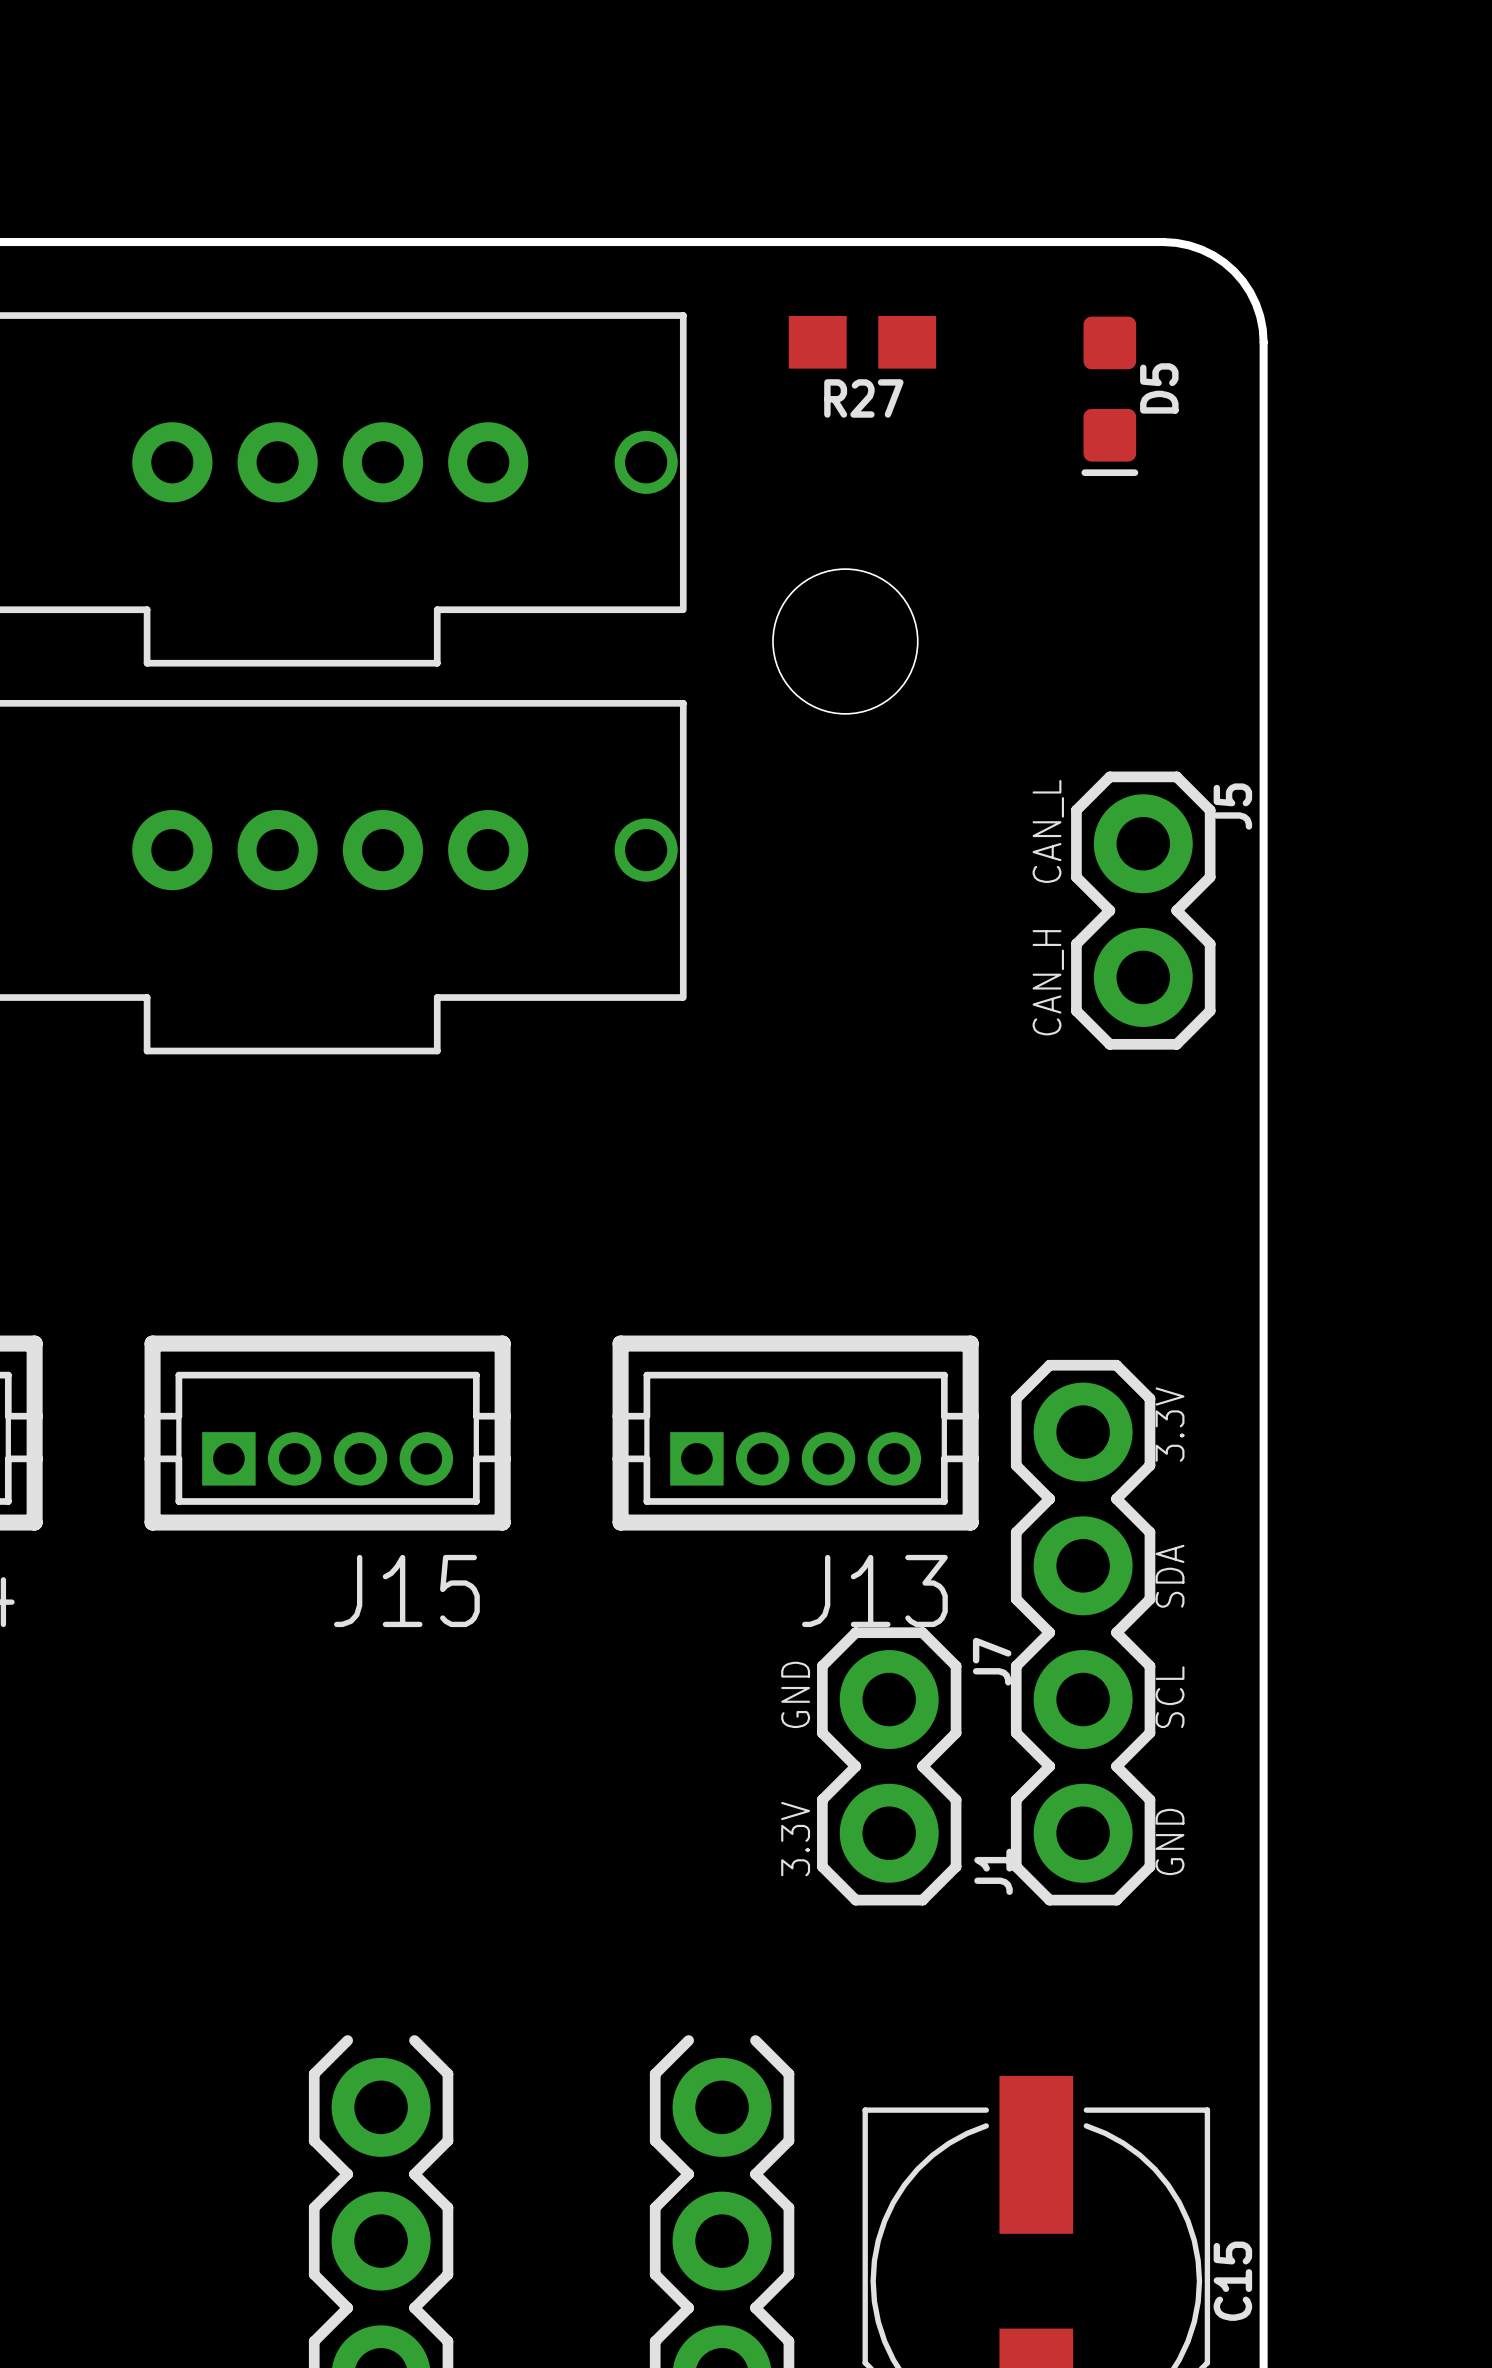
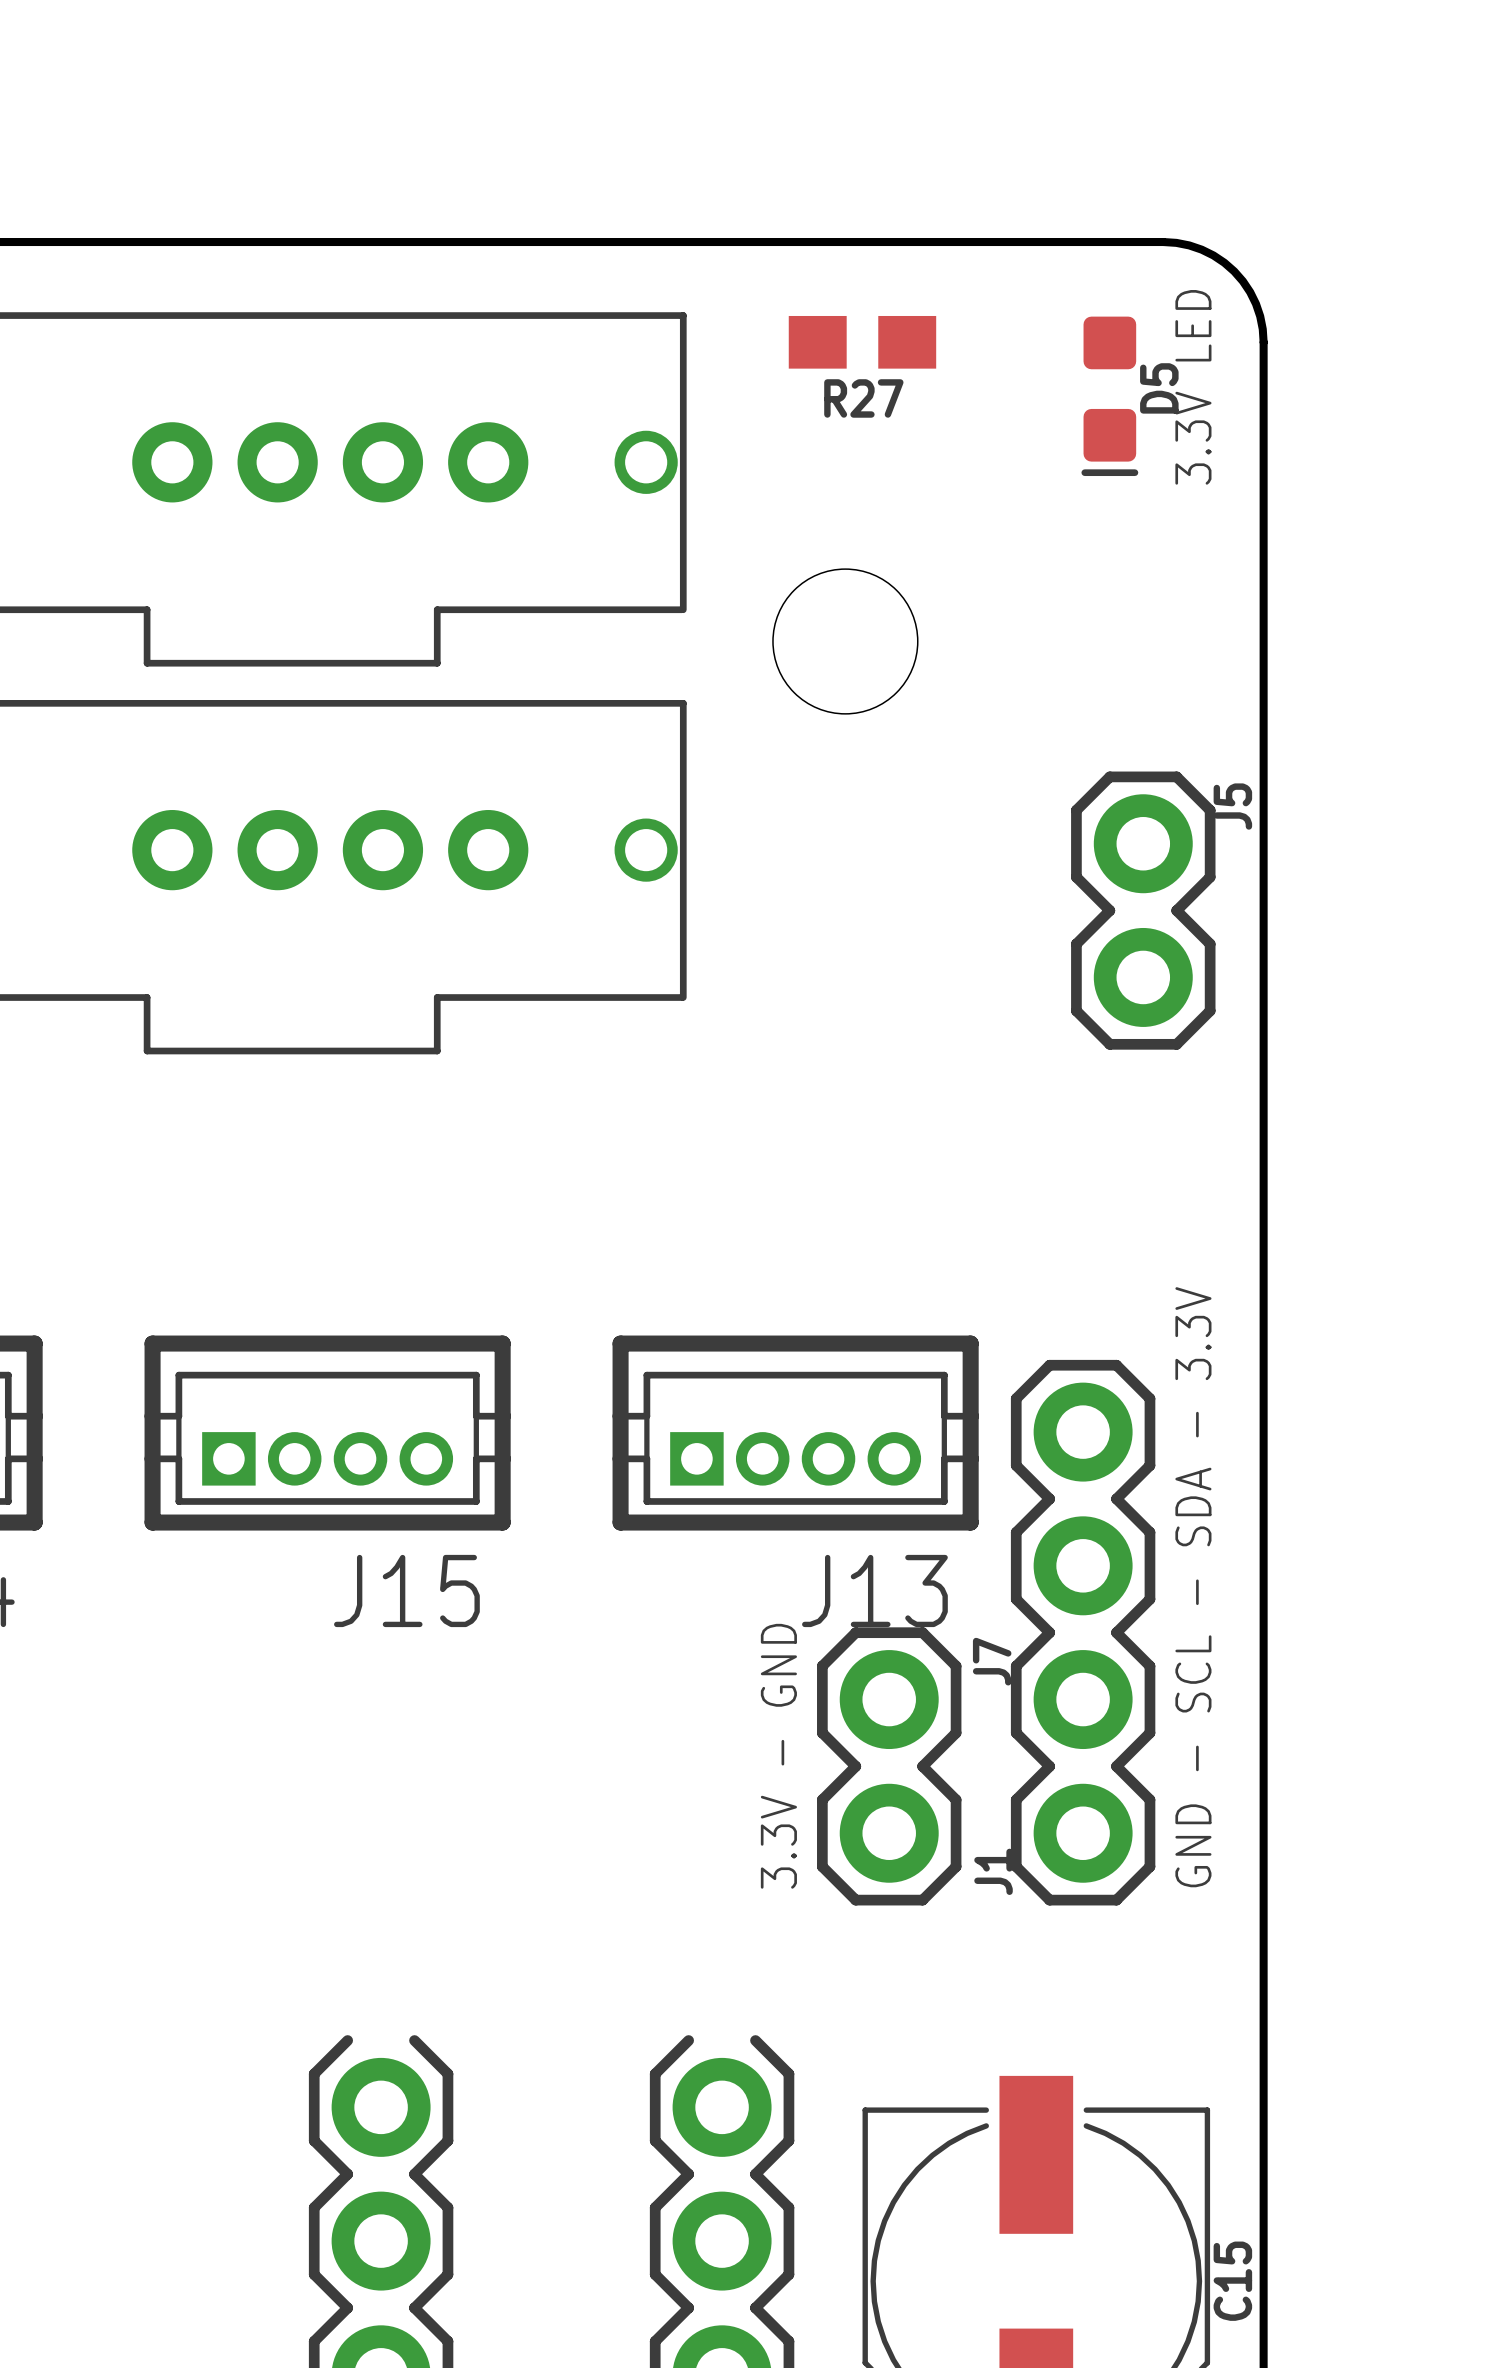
text: none -> 3.3V LED (1193, 387)
text: CAN_L (1048, 831) -> none
text: CAN_H (1048, 982) -> none
text: 3.3V (1170, 1424) -> none
text: SDA (1170, 1576) -> none
text: GND (795, 1694) -> none
text: SCL (1170, 1697) -> none
text: 3.3V (795, 1839) -> 3.3V - GND (778, 1756)
text: GND (1170, 1841) -> GND - SCL - SDA - 3.3V (1193, 1587)

